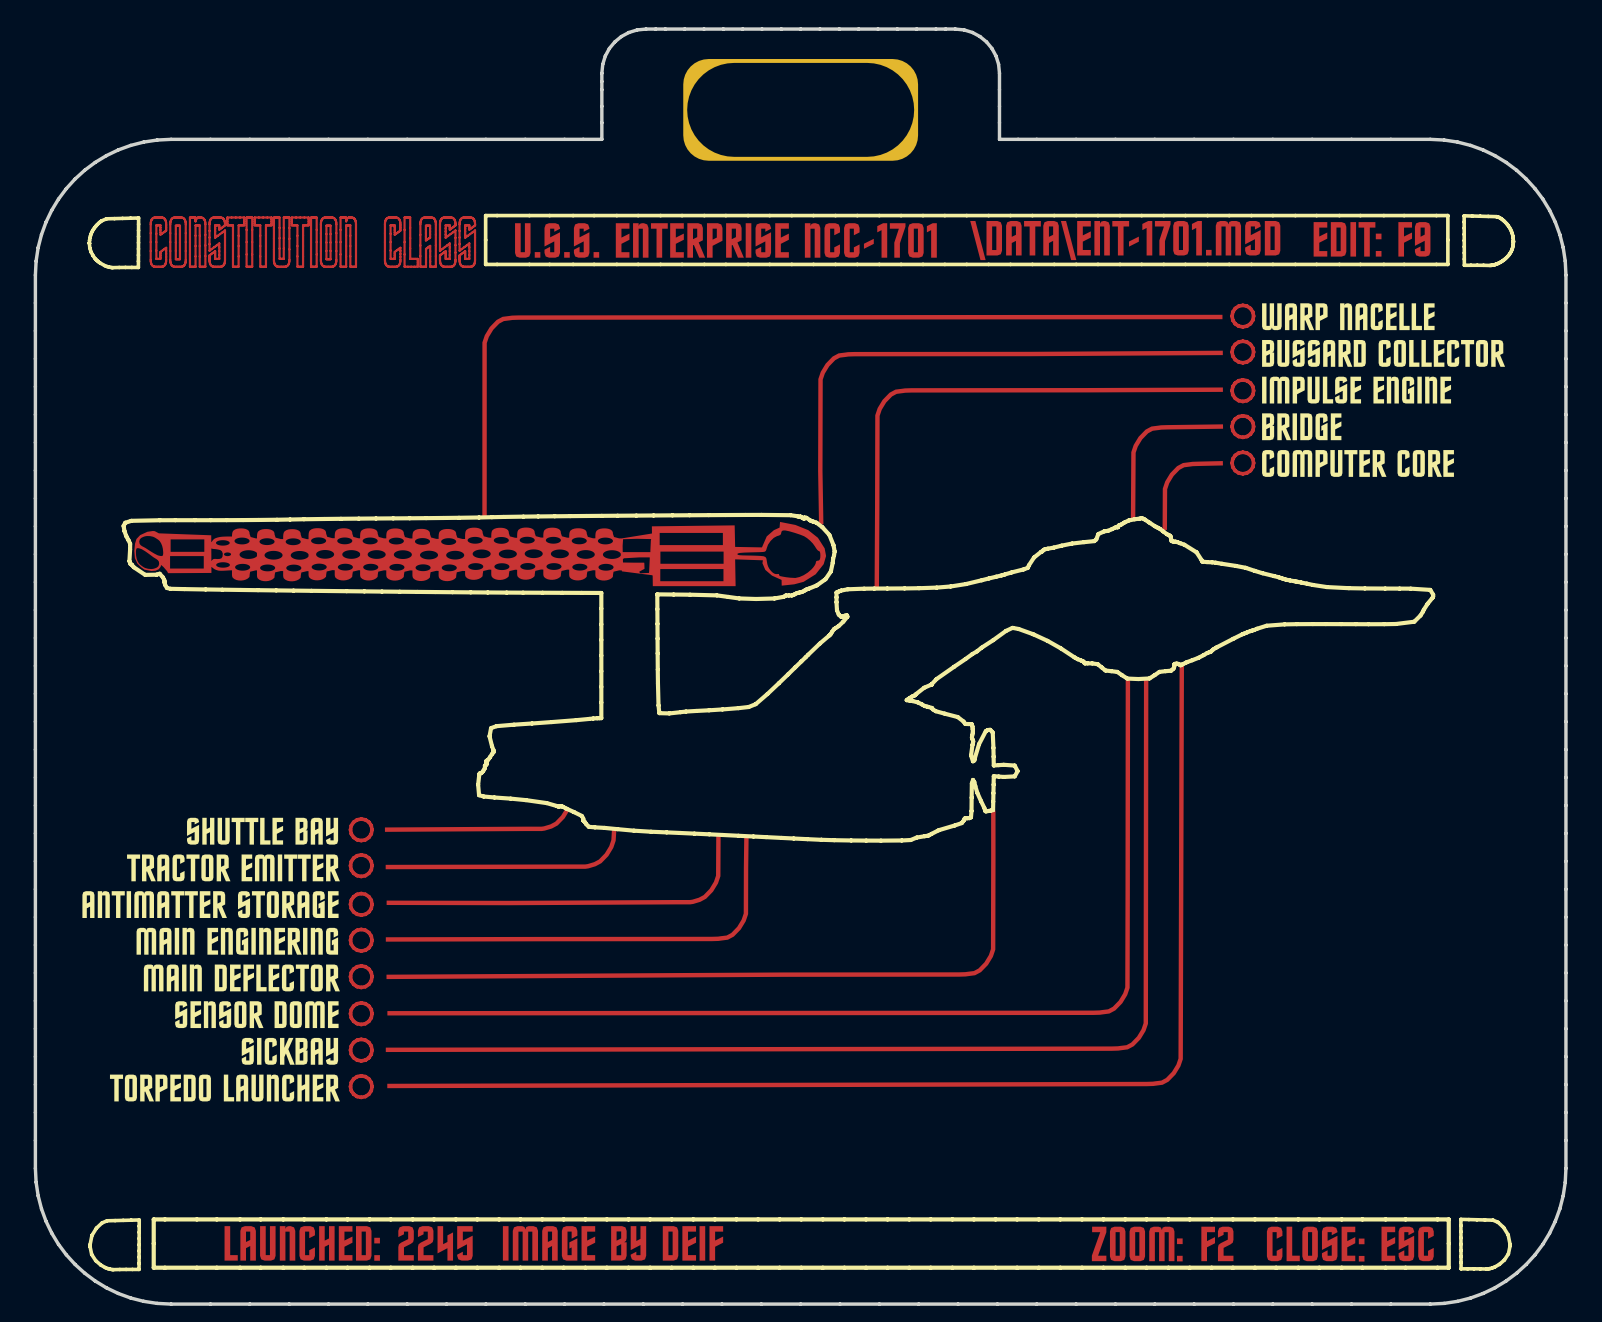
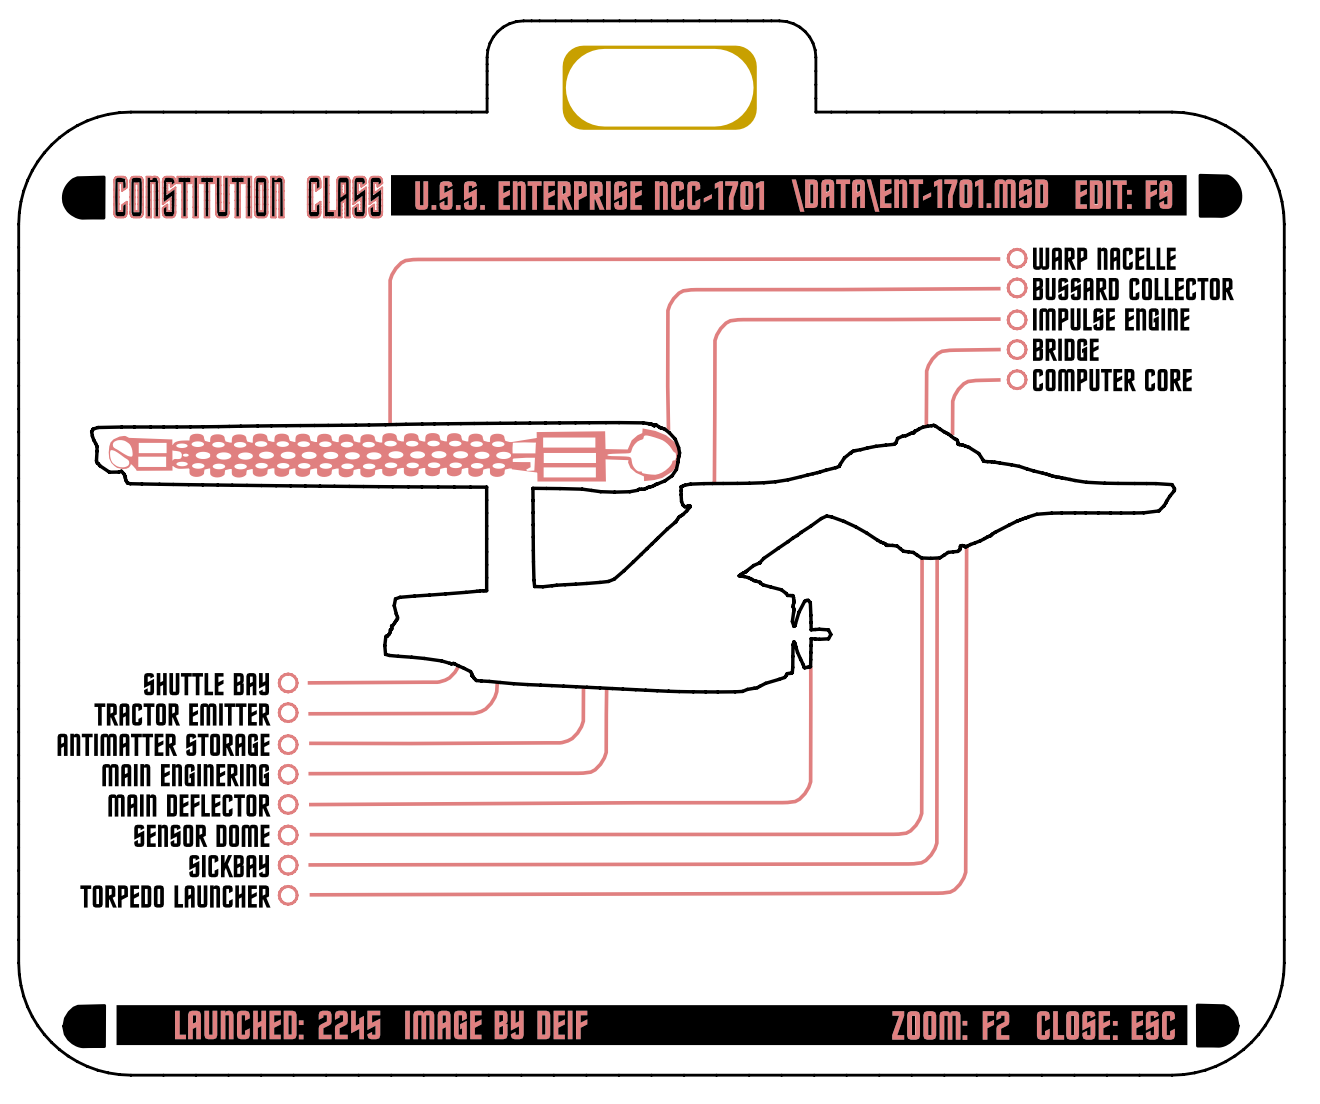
drawing shape: [33, 27, 1568, 1306] -> [17, 19, 1286, 1077]

